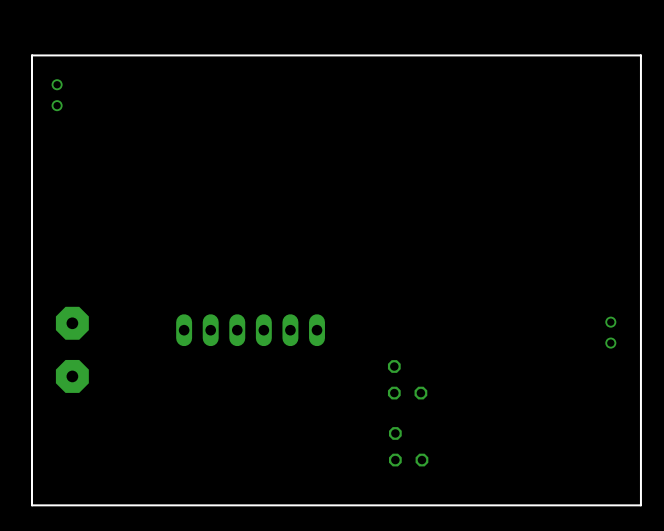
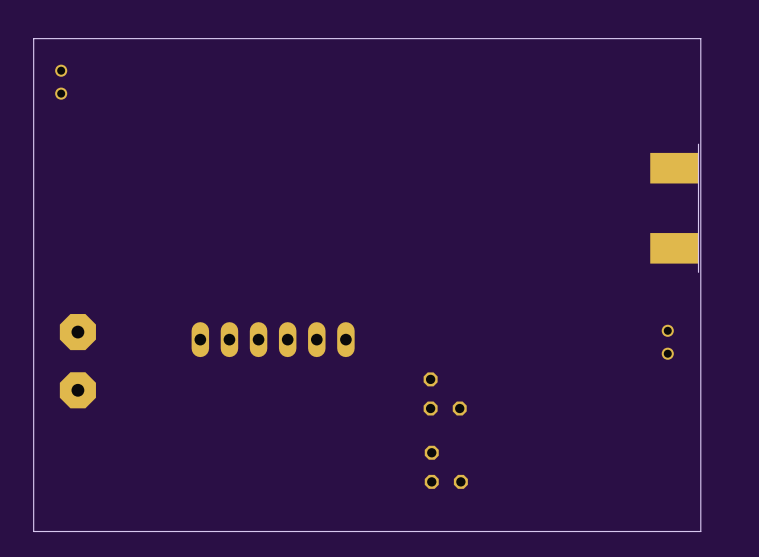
part: none -> (674, 208)

